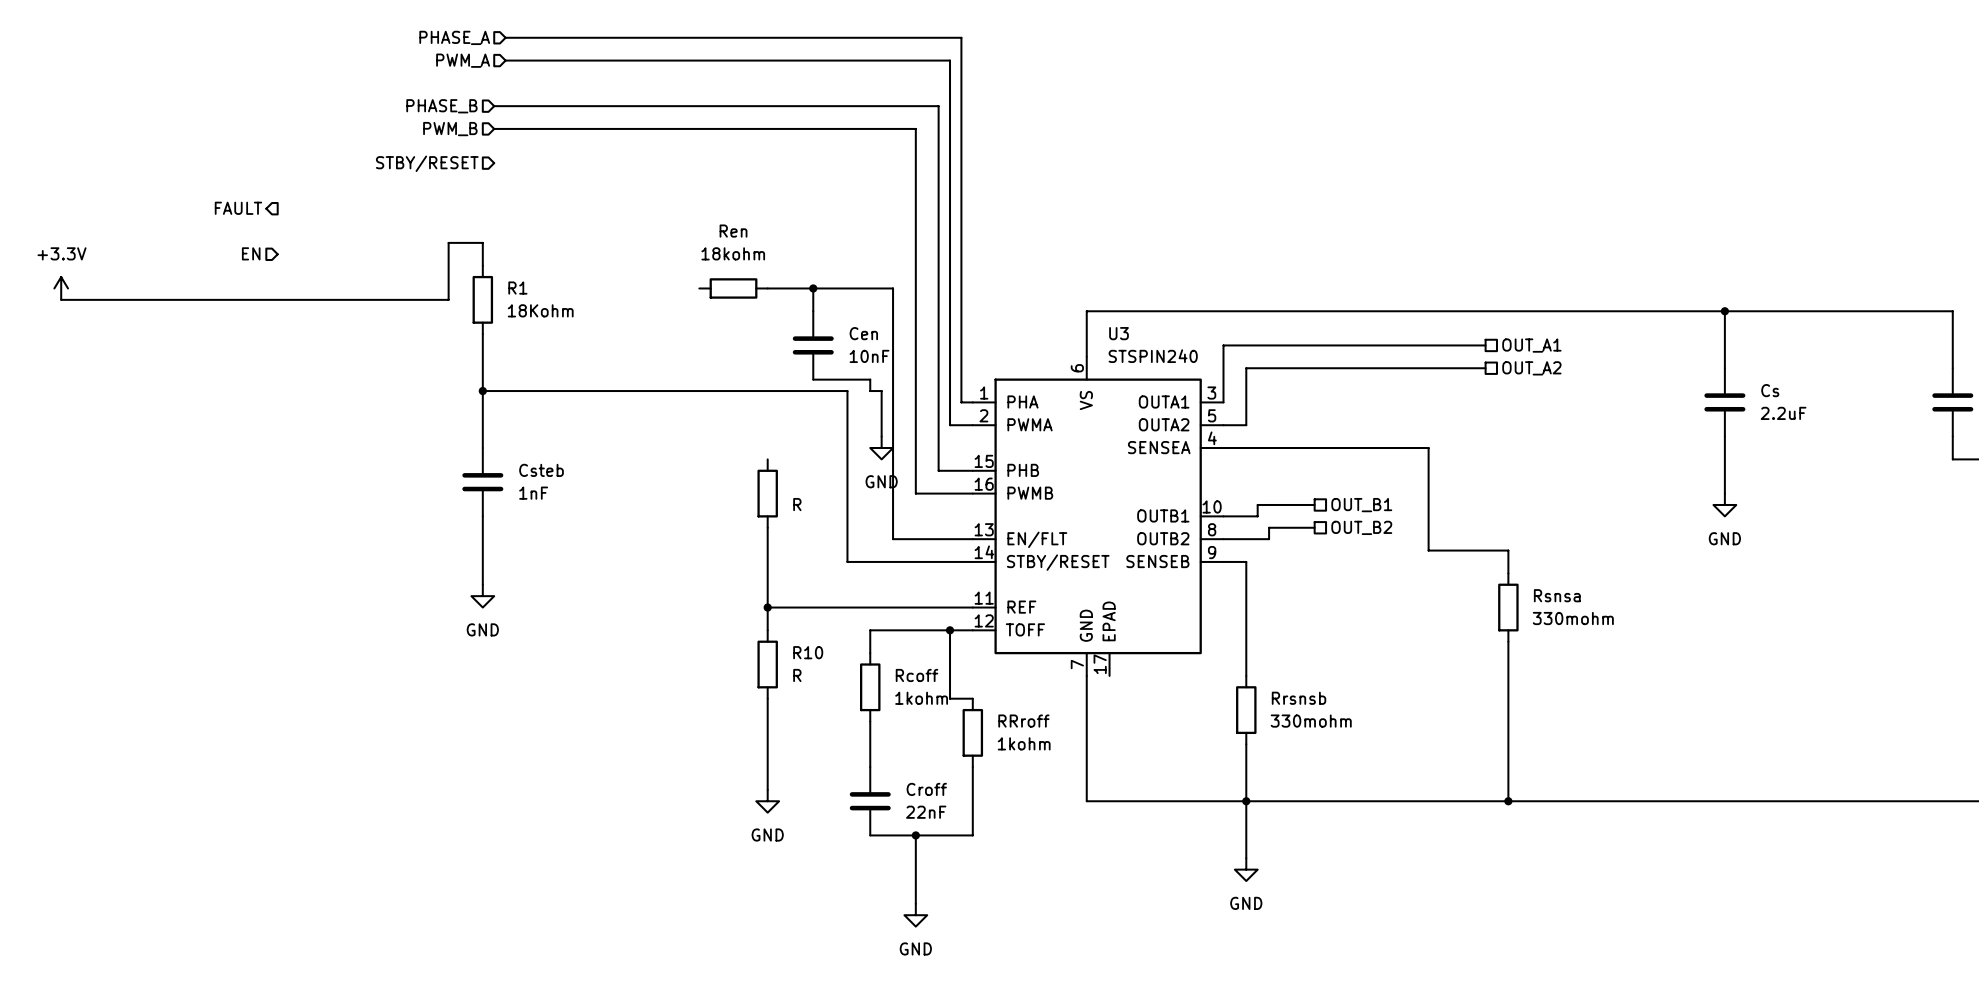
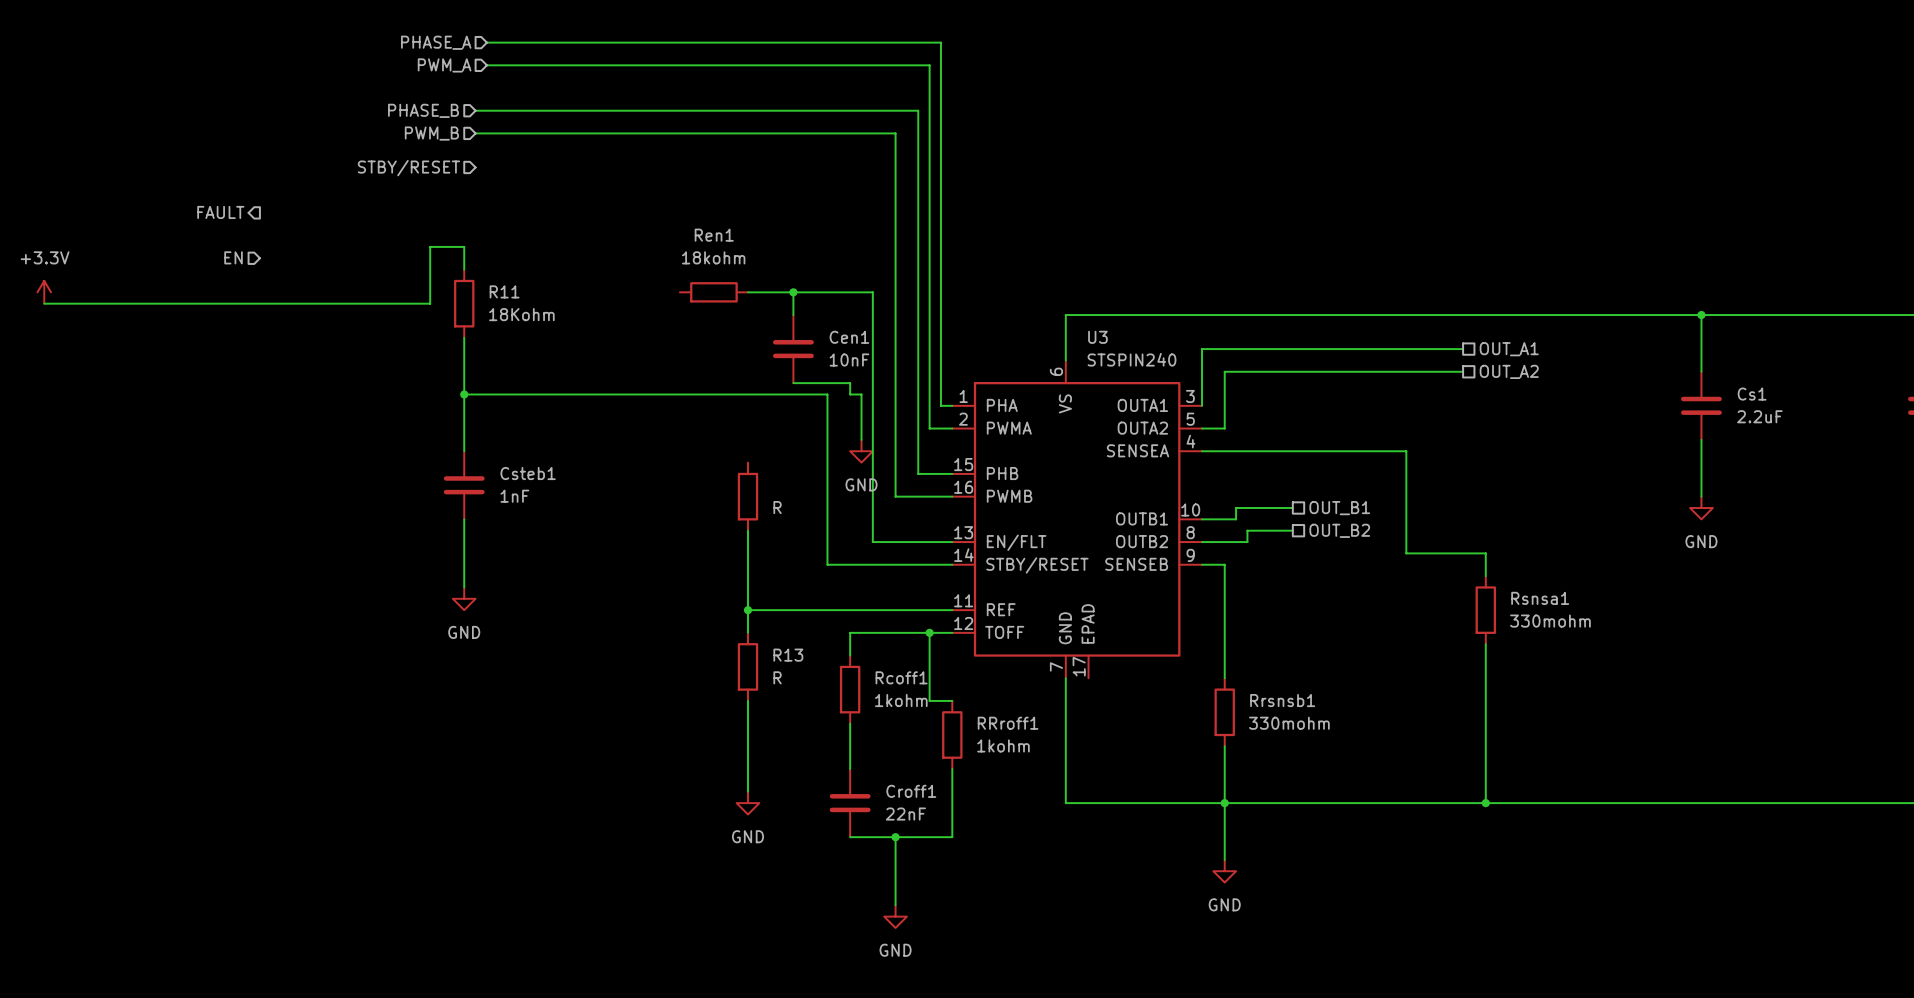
Ren name: Ren (733, 231) -> Ren1 (714, 235)
R1 name: R1 (517, 288) -> R11 (504, 291)
Cen name: Cen (863, 333) -> Cen1 (849, 337)
Cs name: Cs (1770, 390) -> Cs1 (1752, 394)
Csteb name: Csteb (541, 470) -> Csteb1 (528, 473)
Rsnsa name: Rsnsa (1557, 595) -> Rsnsa1 (1540, 598)
R10 name: R10 (808, 652) -> R13 (788, 655)
Rcoff name: Rcoff (917, 675) -> Rcoff1 (901, 677)
Rrsnsb name: Rrsnsb (1299, 698) -> Rrsnsb1 (1282, 700)
RRroff name: RRroff (1023, 721) -> RRroff1 (1008, 723)
Croff name: Croff (926, 789) -> Croff1 (911, 791)

